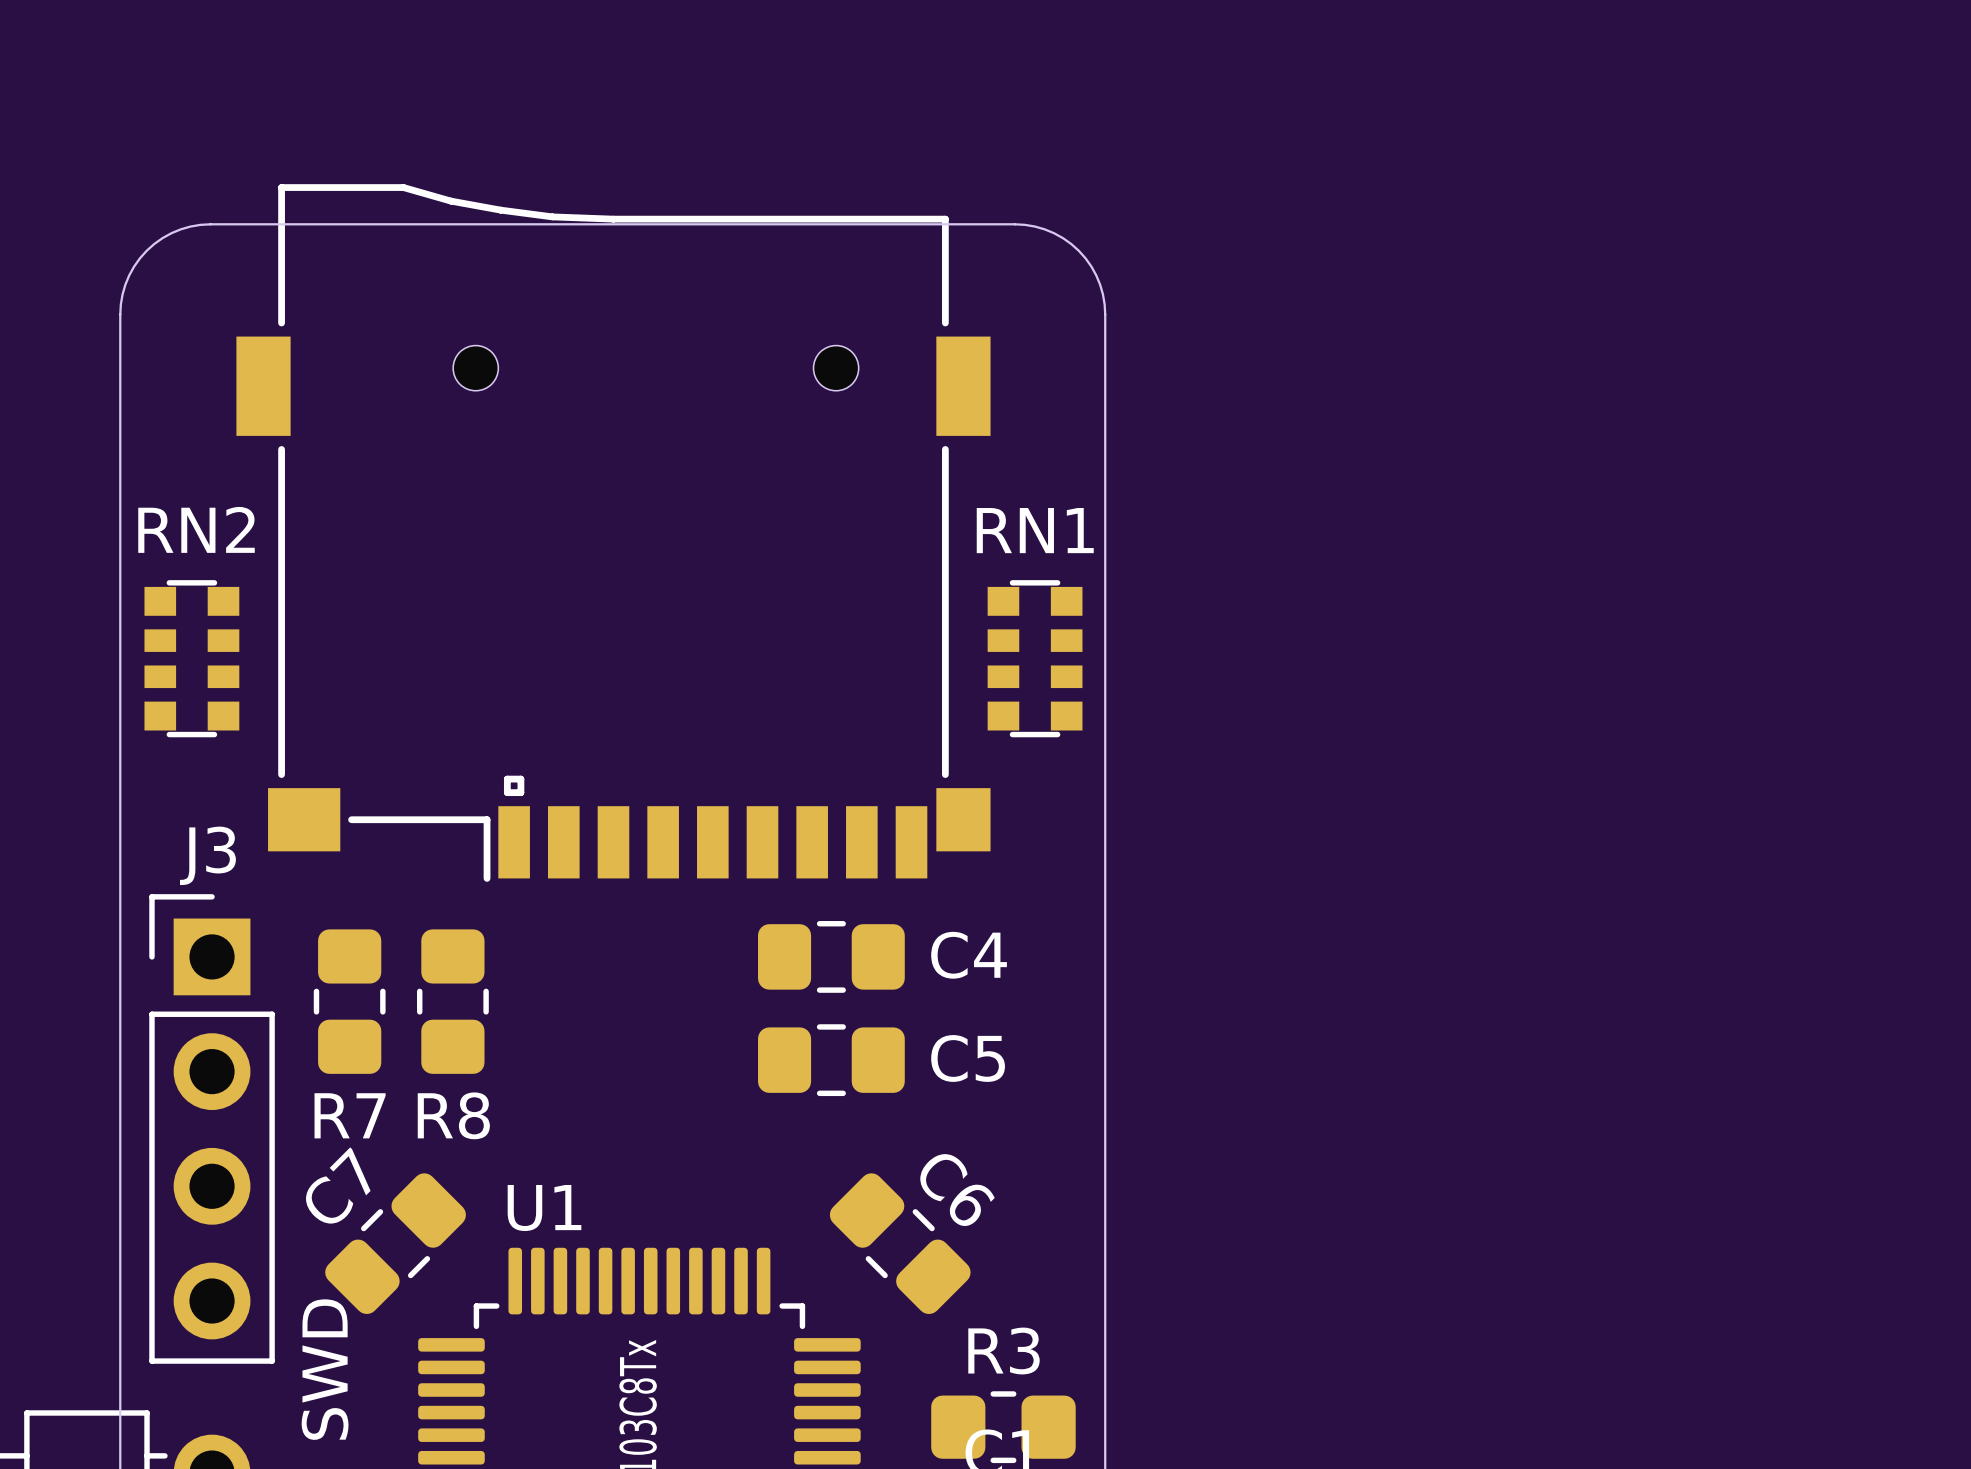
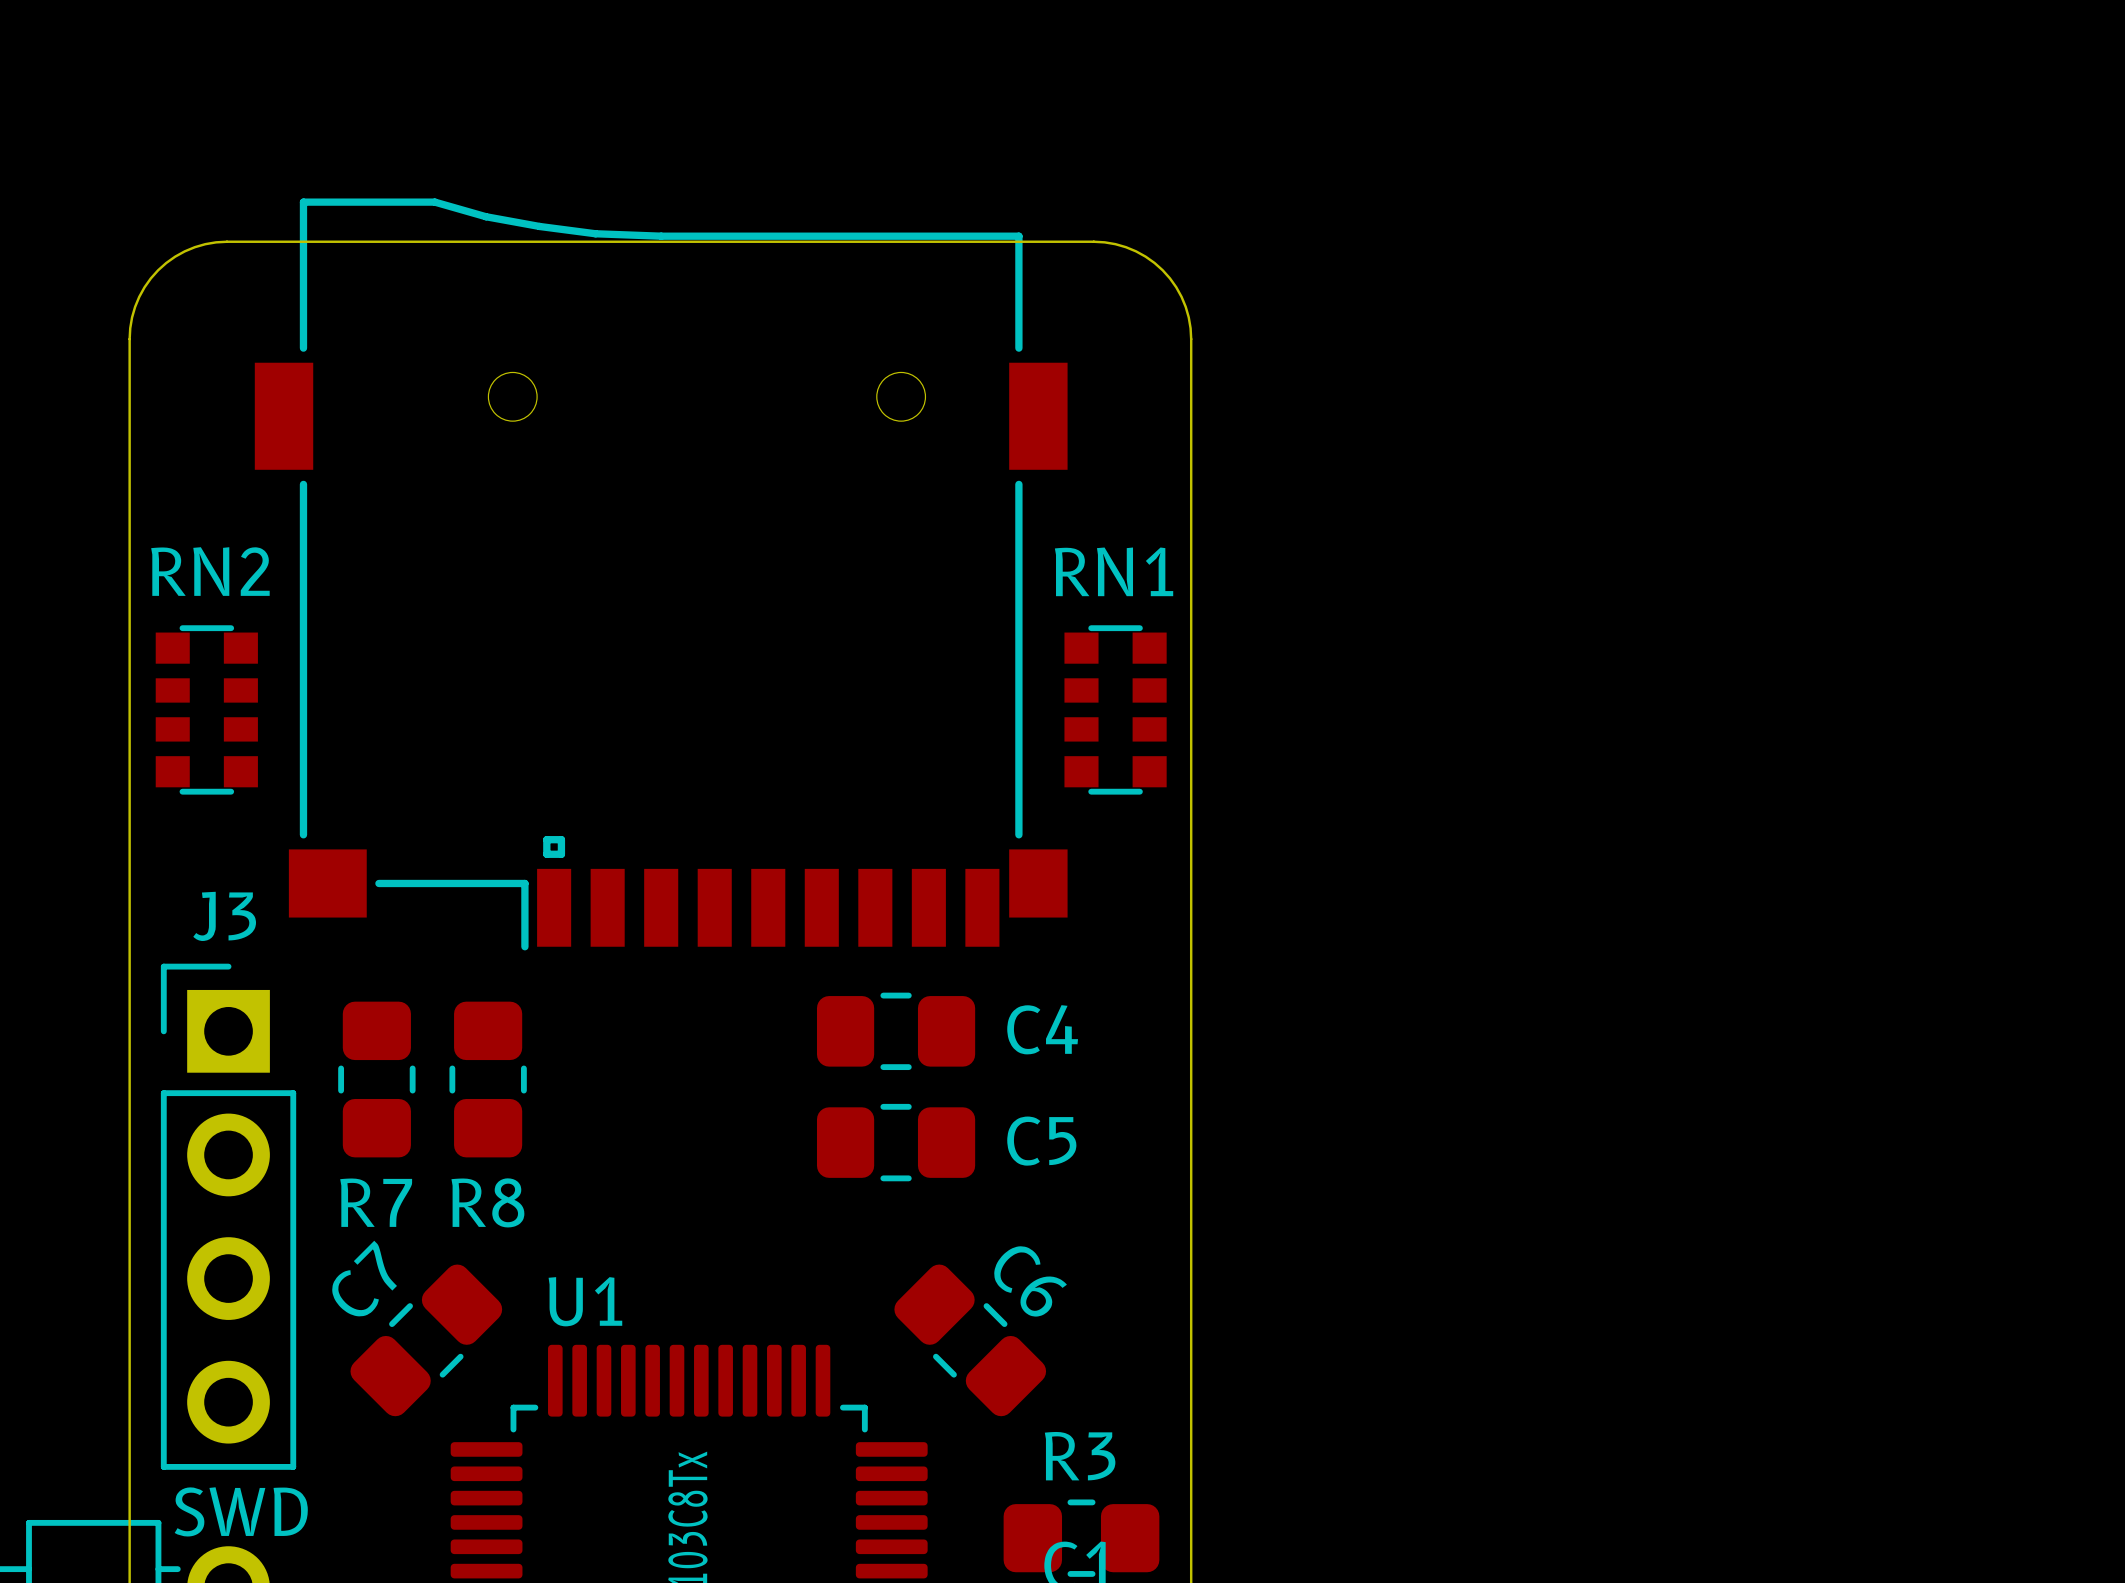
J3 value rotation: 0° (325, 1369) -> 90° clockwise (241, 1511)

